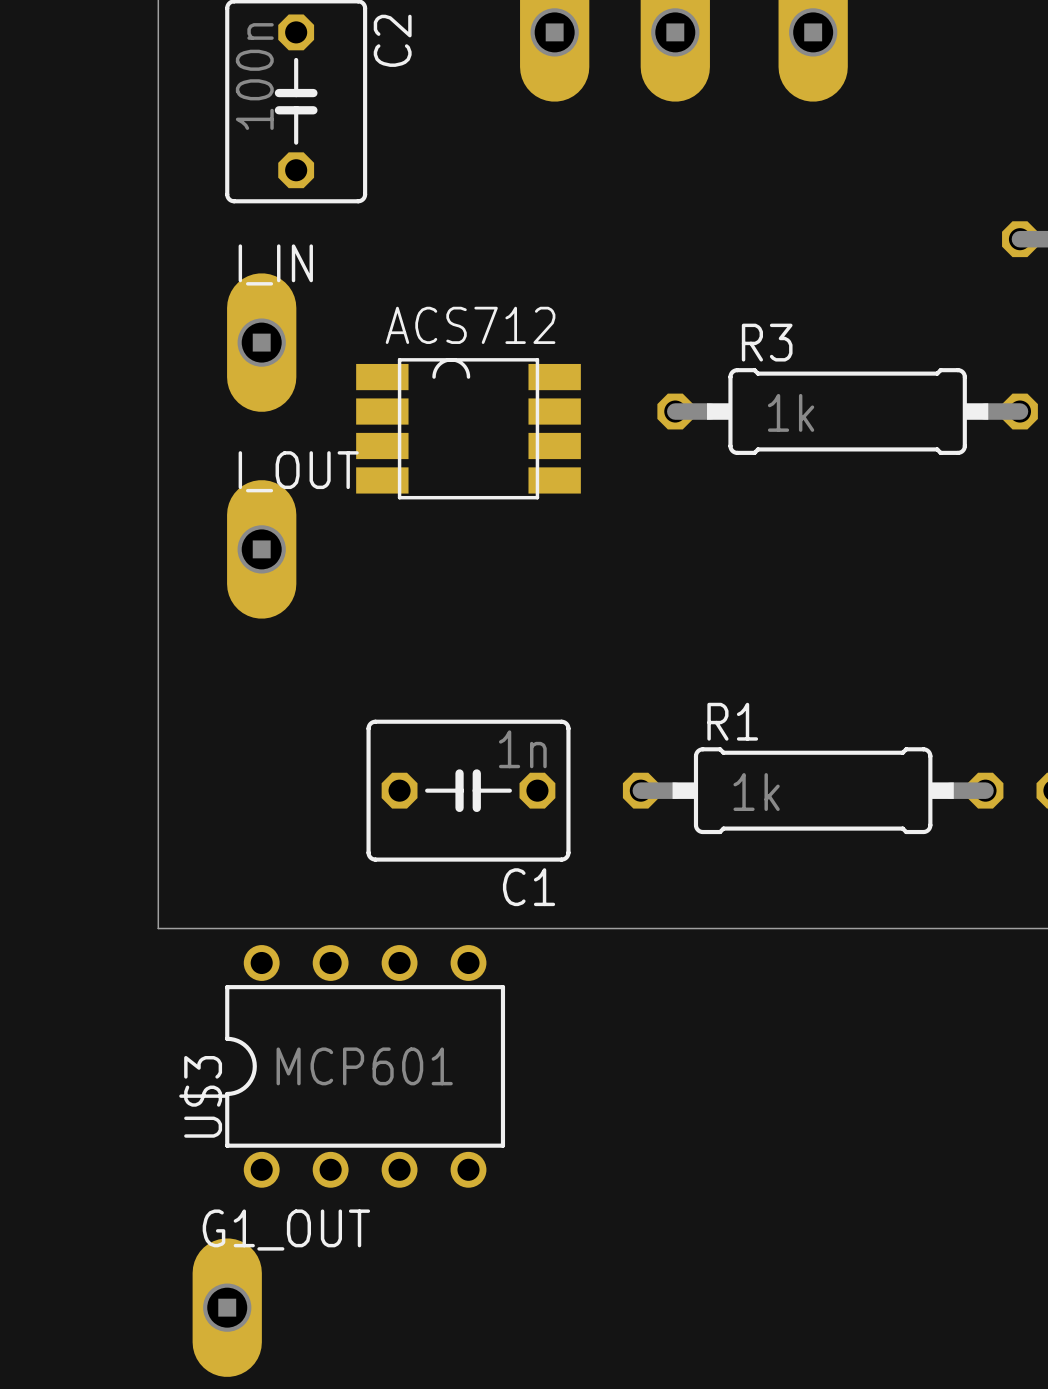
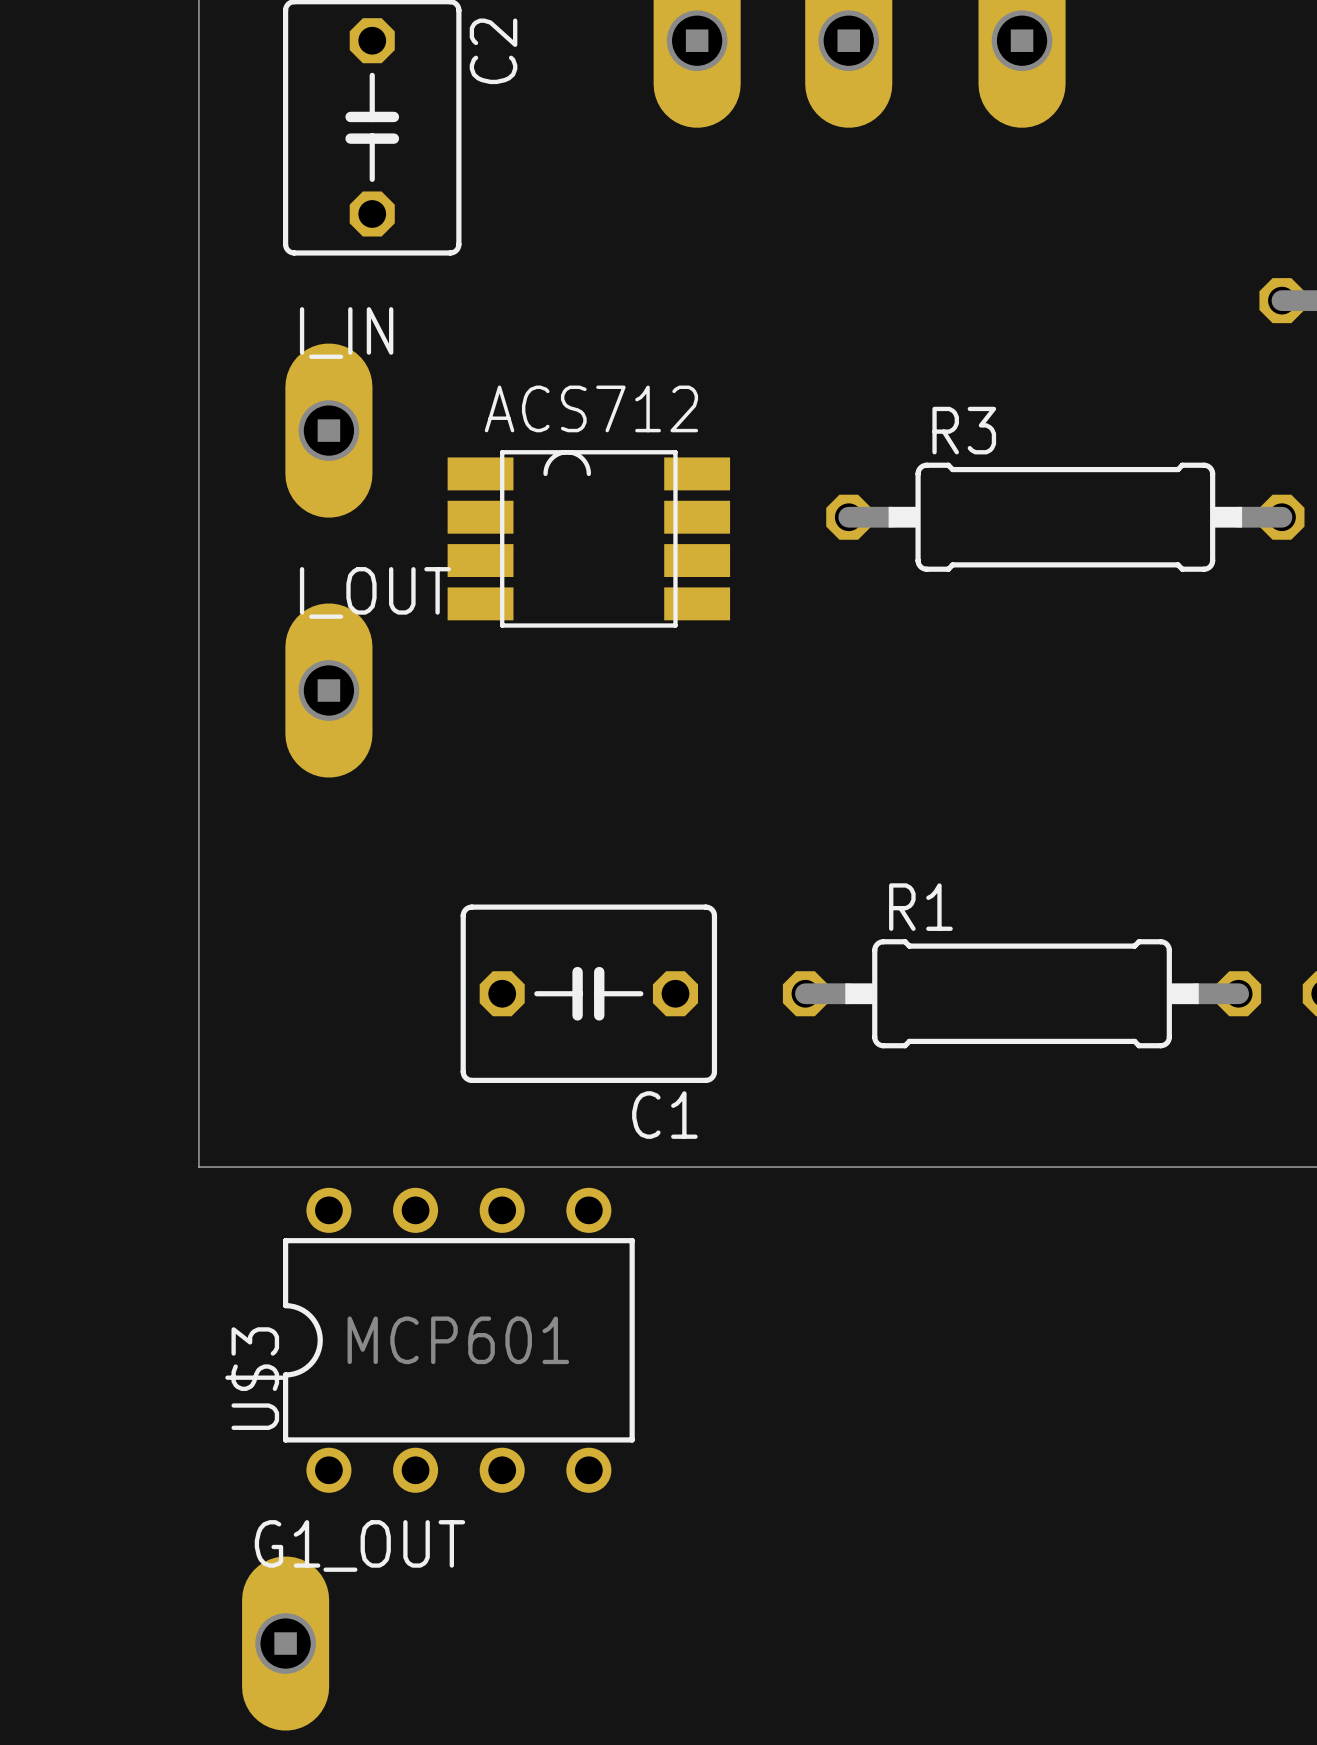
C2 value: 100n (254, 76) -> none
R3 value: 1k (791, 412) -> none
C1 value: 1n (522, 749) -> none
R1 value: 1k (756, 792) -> none

